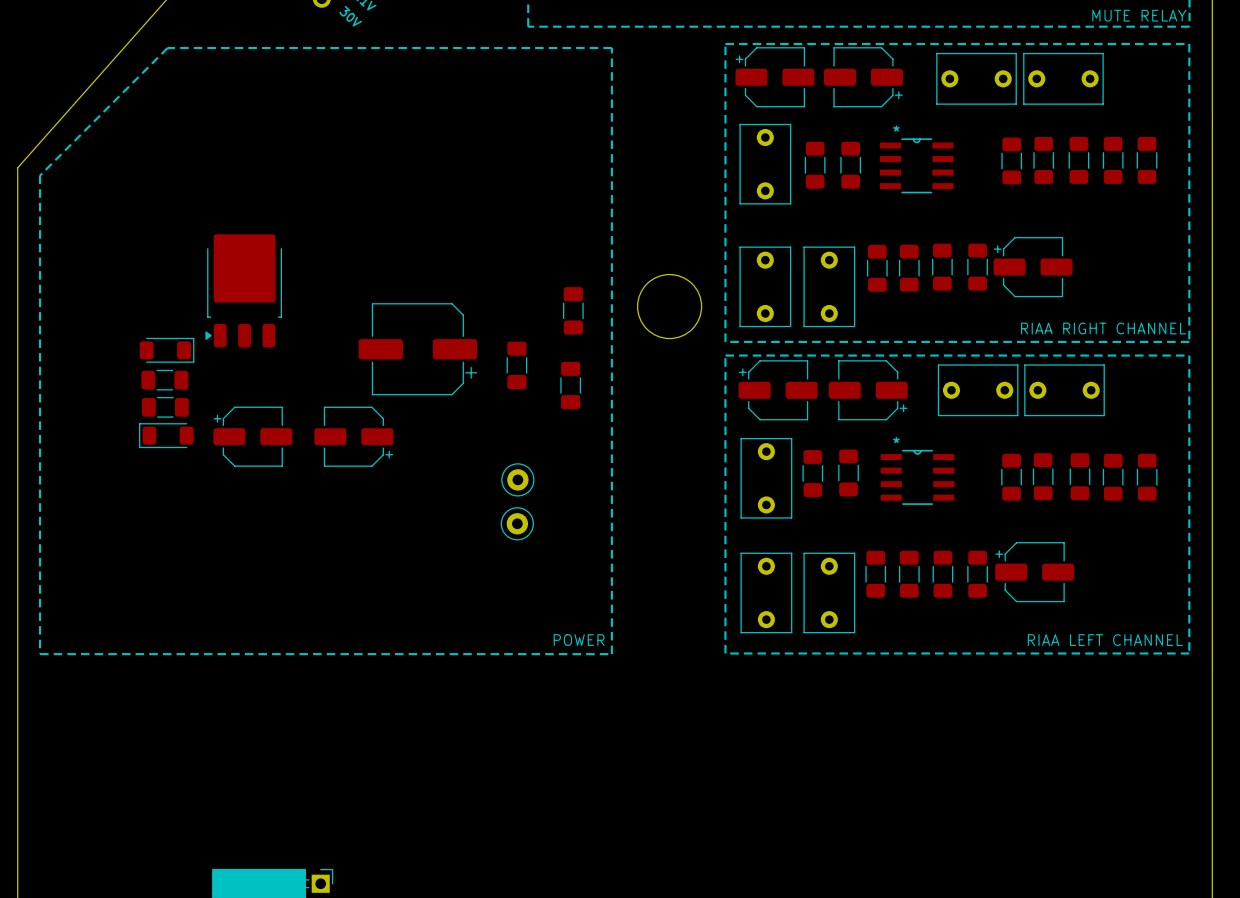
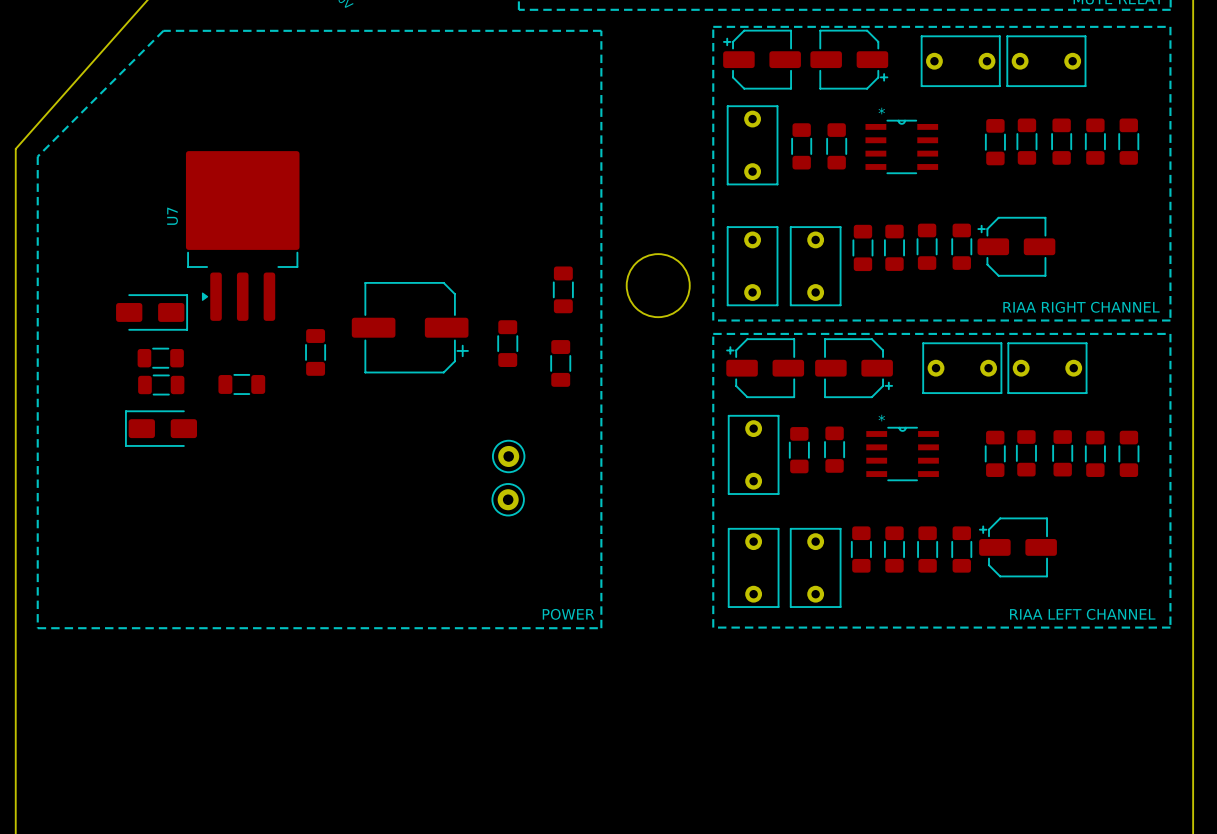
U7: none -> (242, 235)
part: (243, 290) -> none
part: none -> (151, 312)
part: (167, 350) -> none
part: none -> (315, 352)
part: none -> (241, 384)
part: (166, 435) -> none
part: (252, 436) -> none
part: (353, 436) -> none
part: none -> (161, 428)

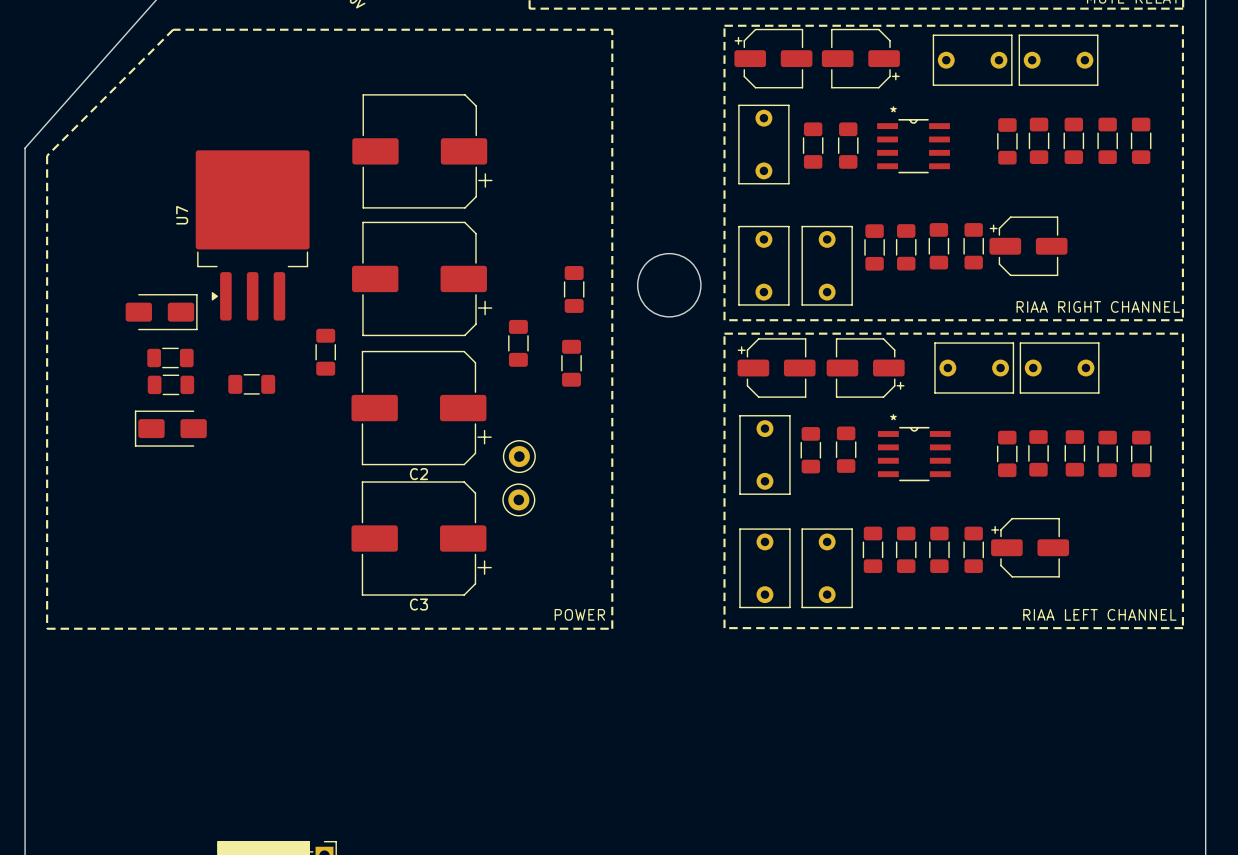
part: none -> (422, 151)
part: none -> (422, 278)
part: (410, 327) -> none
C2: none -> (421, 408)
C3: none -> (421, 538)

